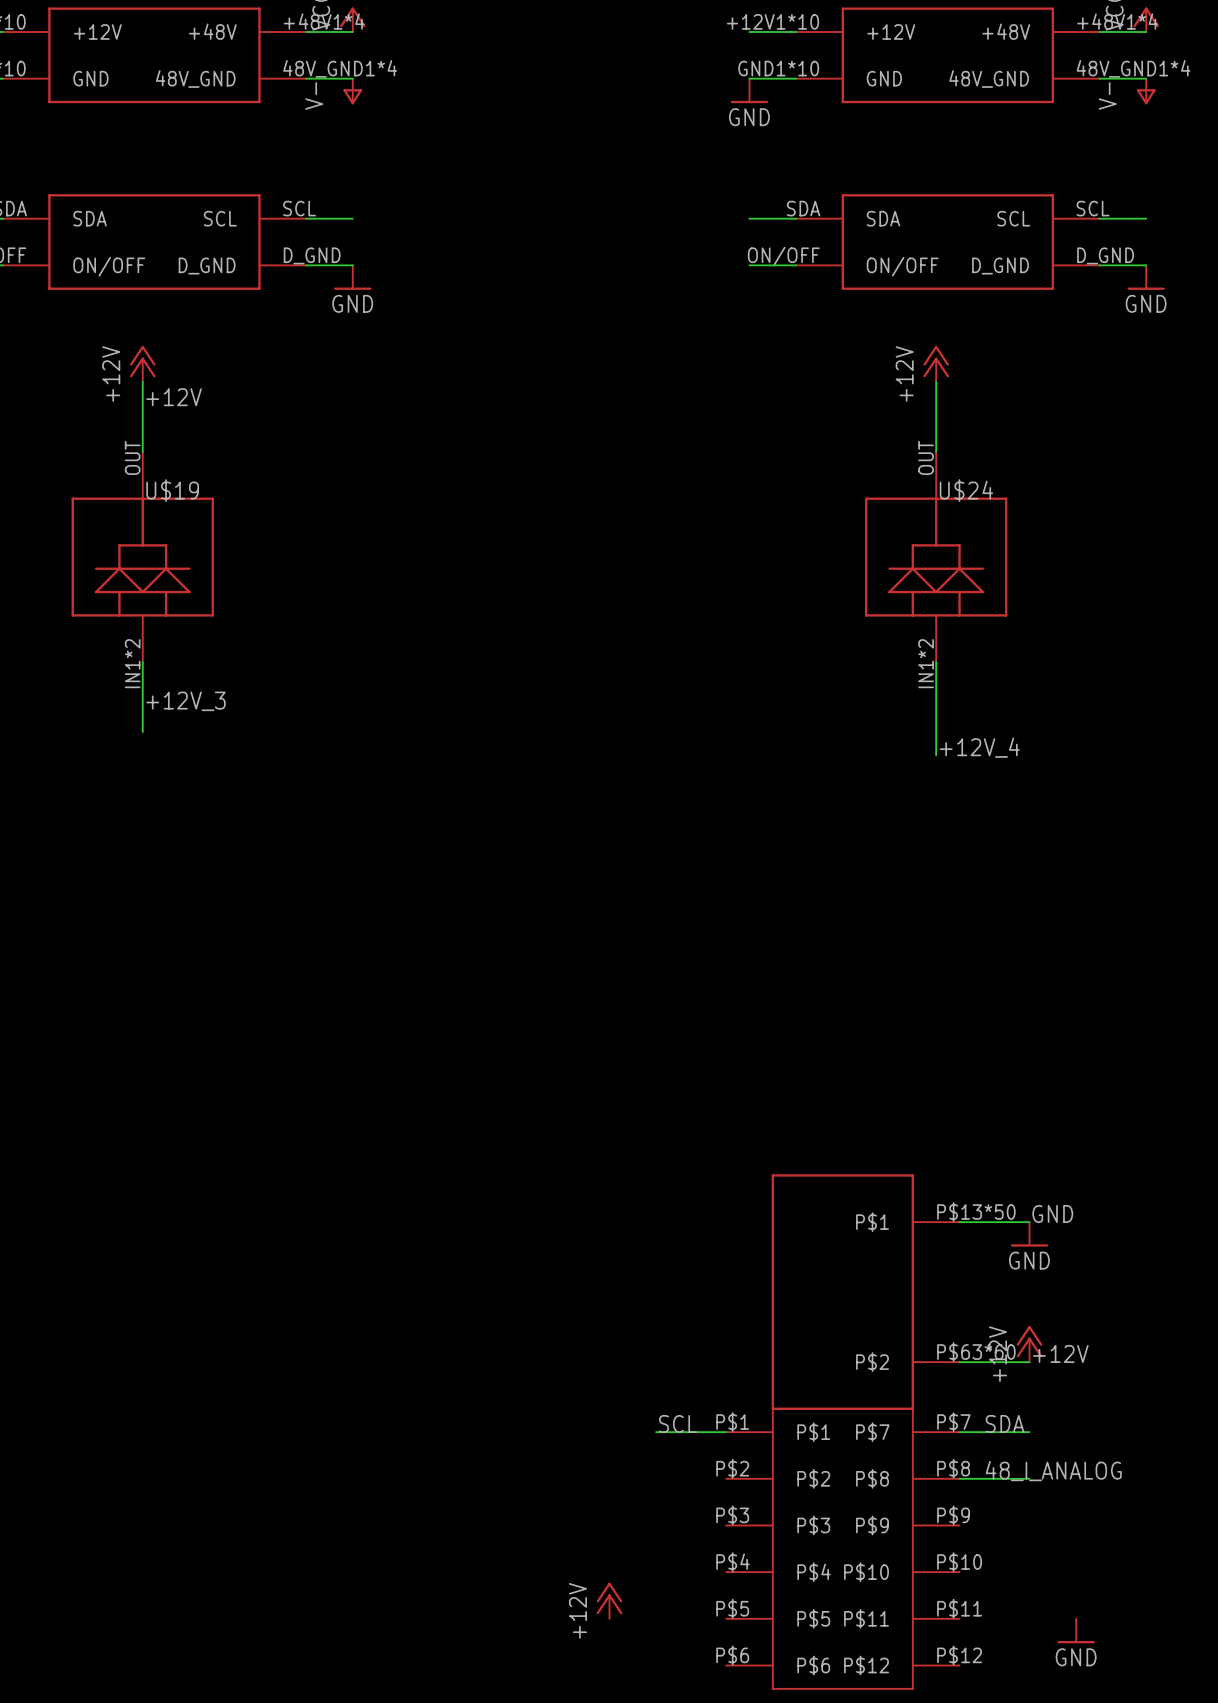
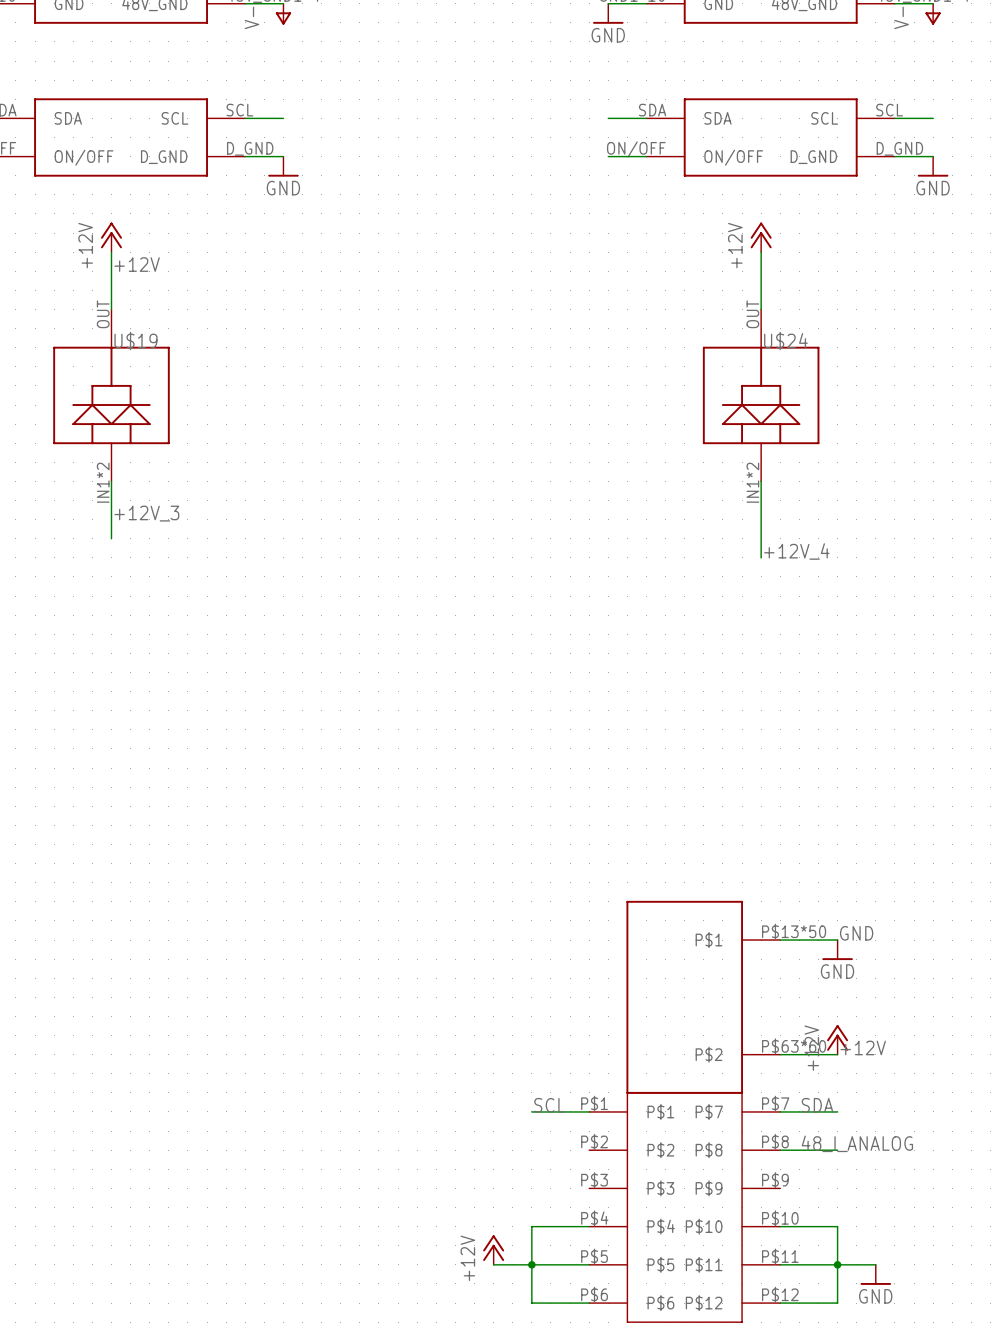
wire: none -> (589, 1226) (531, 1226) (531, 1303) (589, 1303)
wire: none -> (780, 1226) (837, 1226) (837, 1303) (780, 1303)
wire: none -> (493, 1264) (589, 1264)
junction: none -> (531, 1264)
wire: none -> (780, 1264) (875, 1264)
junction: none -> (837, 1264)

